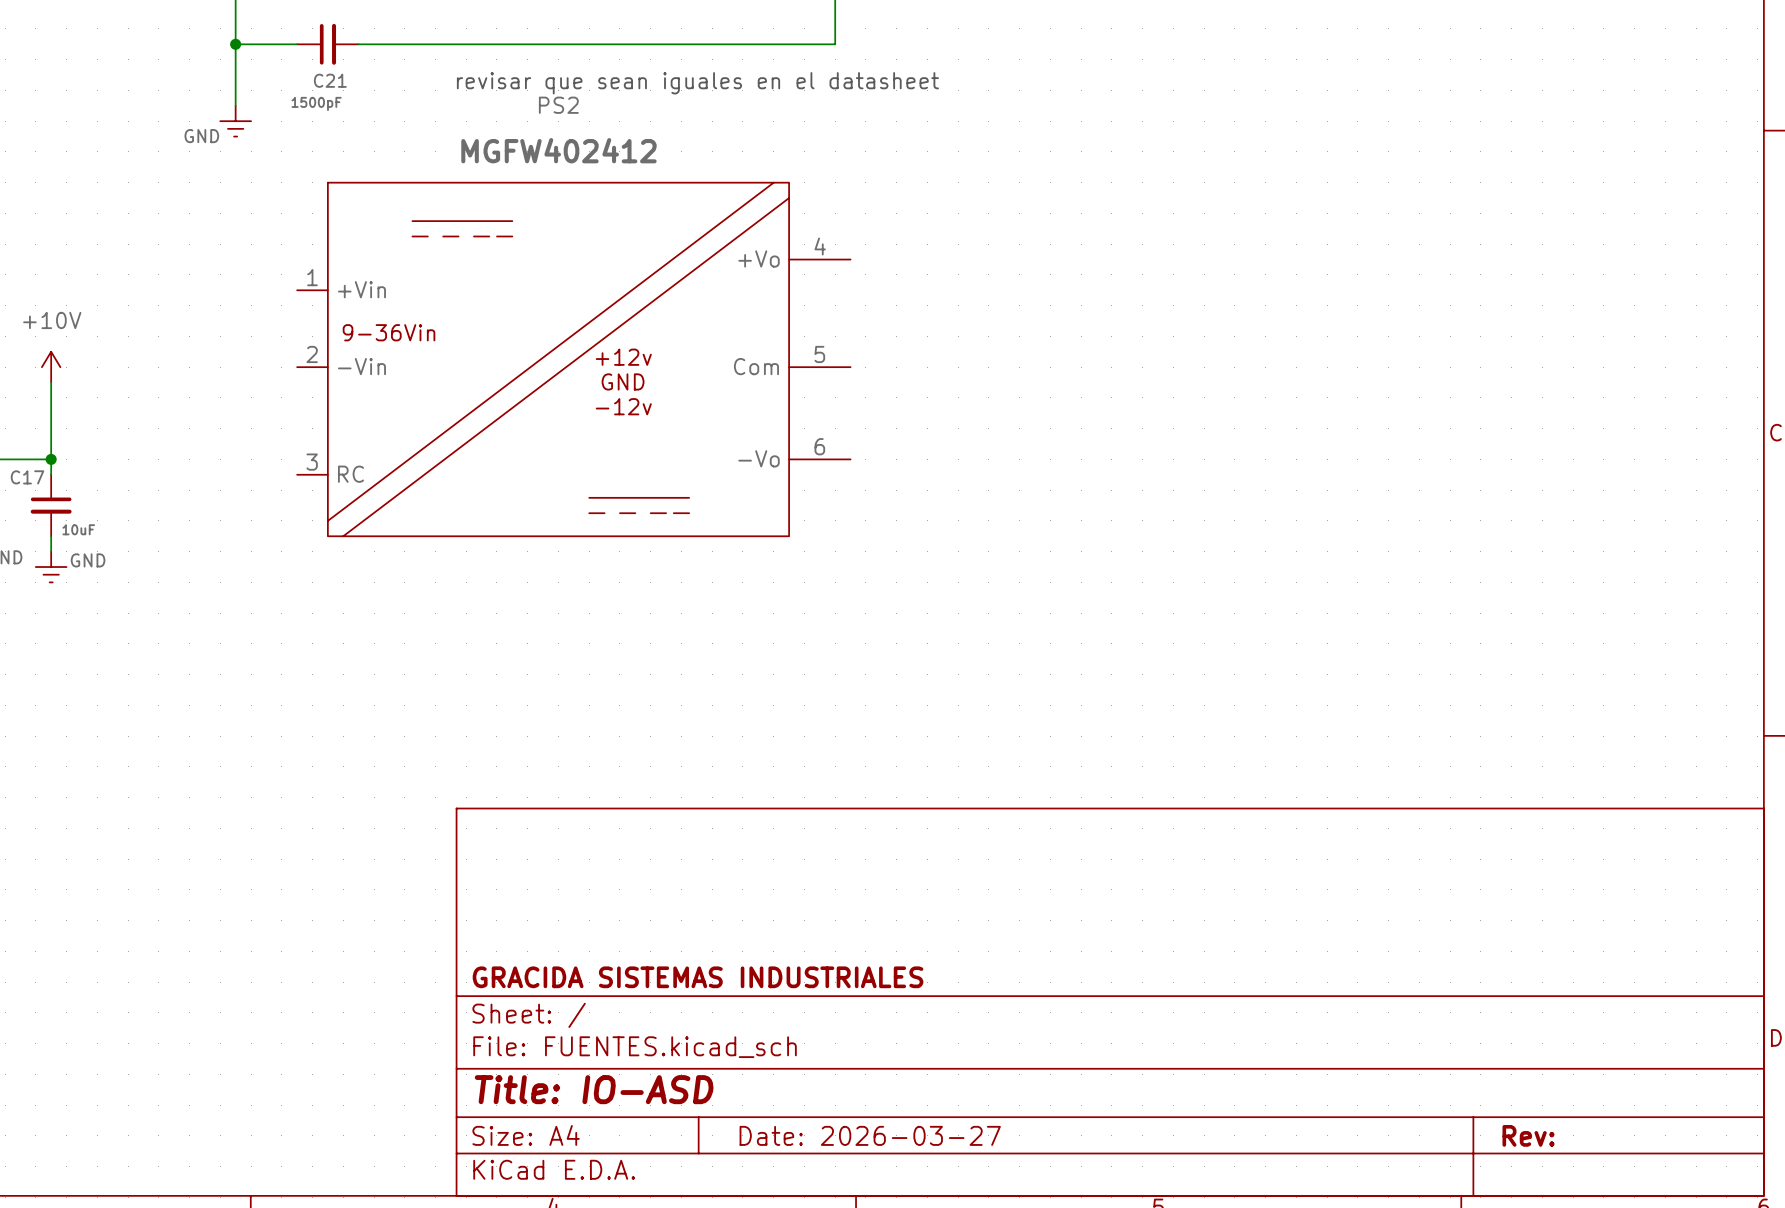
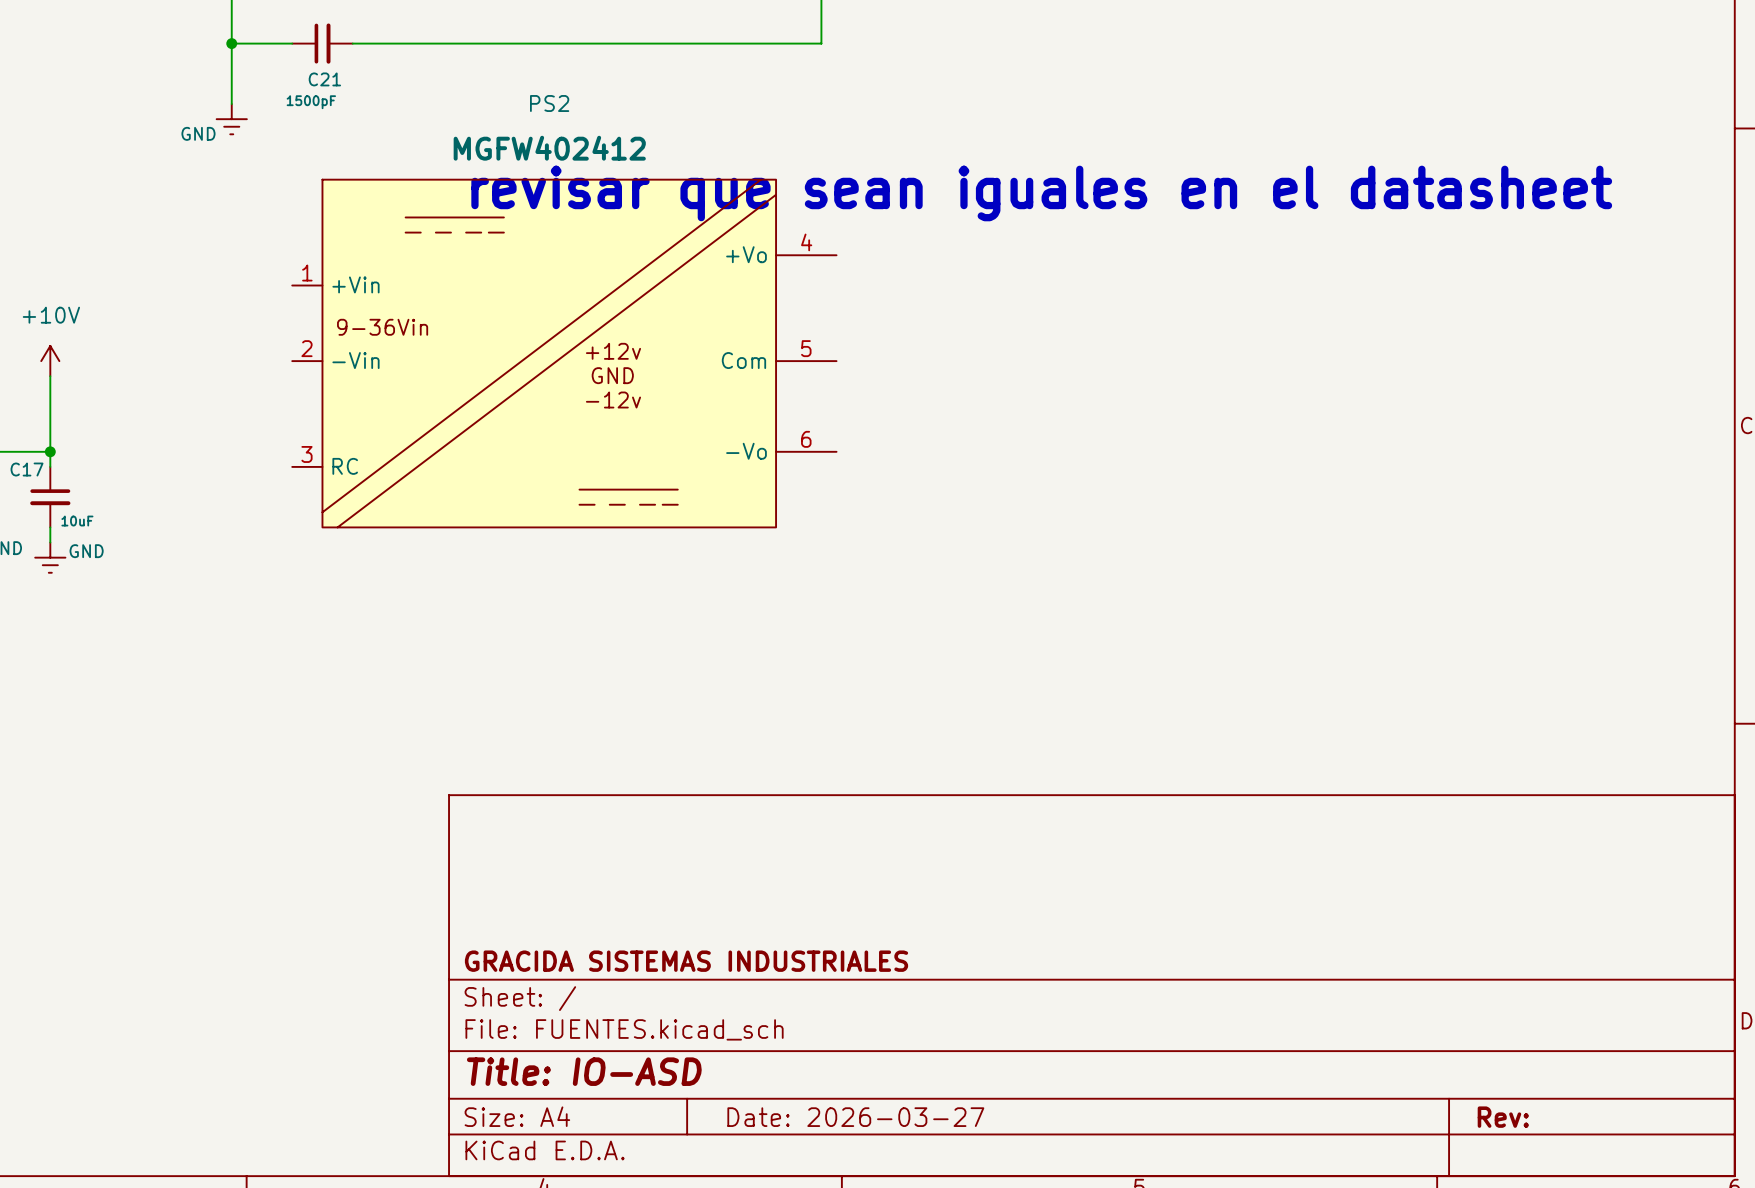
text: revisar que sean iguales en el datasheet (697, 83) -> none
text: none -> revisar que sean iguales en el datasheet (1041, 193)

